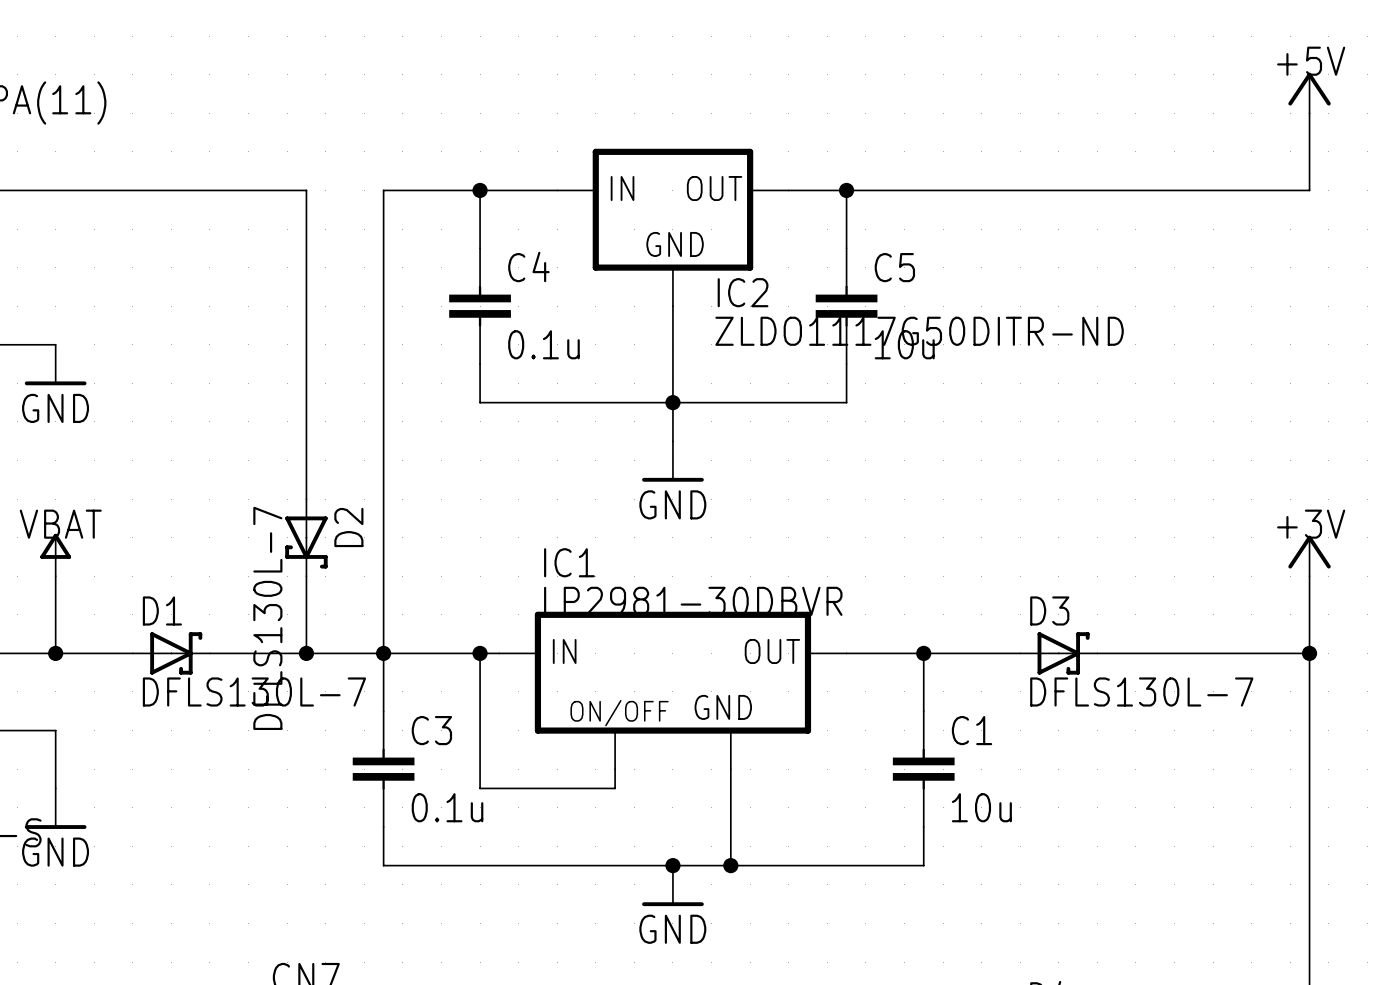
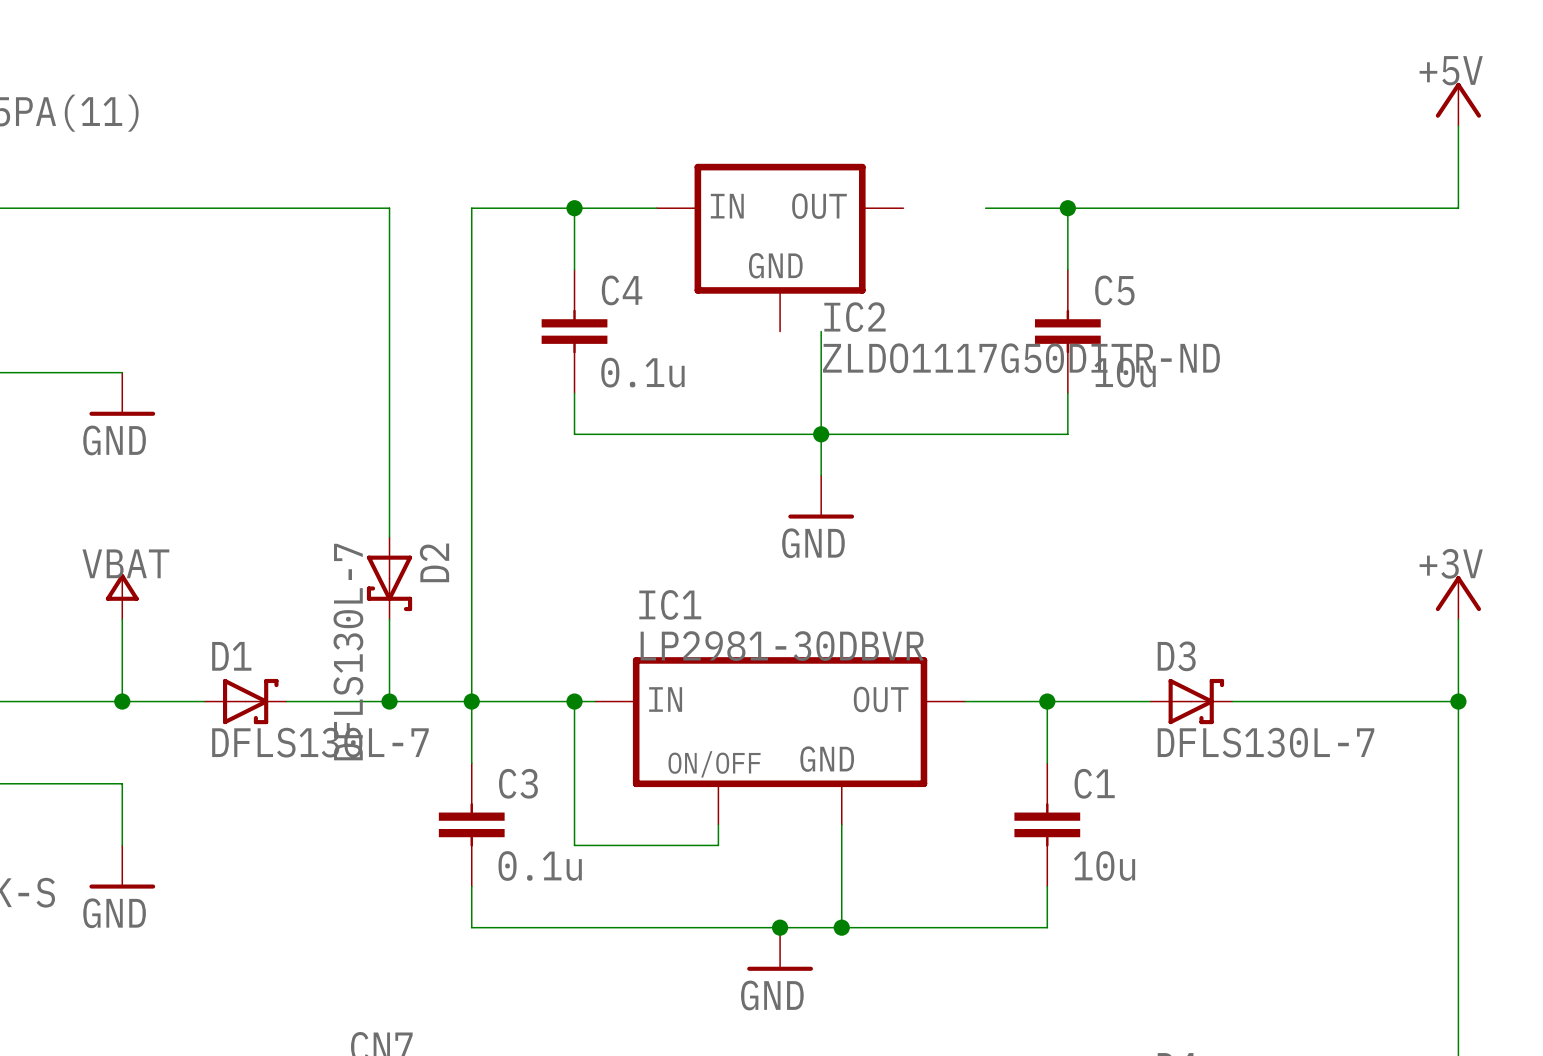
wire: (788, 190) (865, 190) -> none
wire: (846, 190) (846, 248) -> (1067, 208) (1067, 269)
junction: (846, 190) -> none
junction: none -> (1067, 208)
wire: (672, 306) (672, 441) -> (821, 331) (821, 475)
C5 position: (846, 306) -> (1067, 331)
wire: (846, 364) (846, 402) -> (1067, 393) (1067, 434) (965, 434)
junction position: (672, 402) -> (821, 434)
power symbol position: GND (672, 461) -> GND (821, 497)

